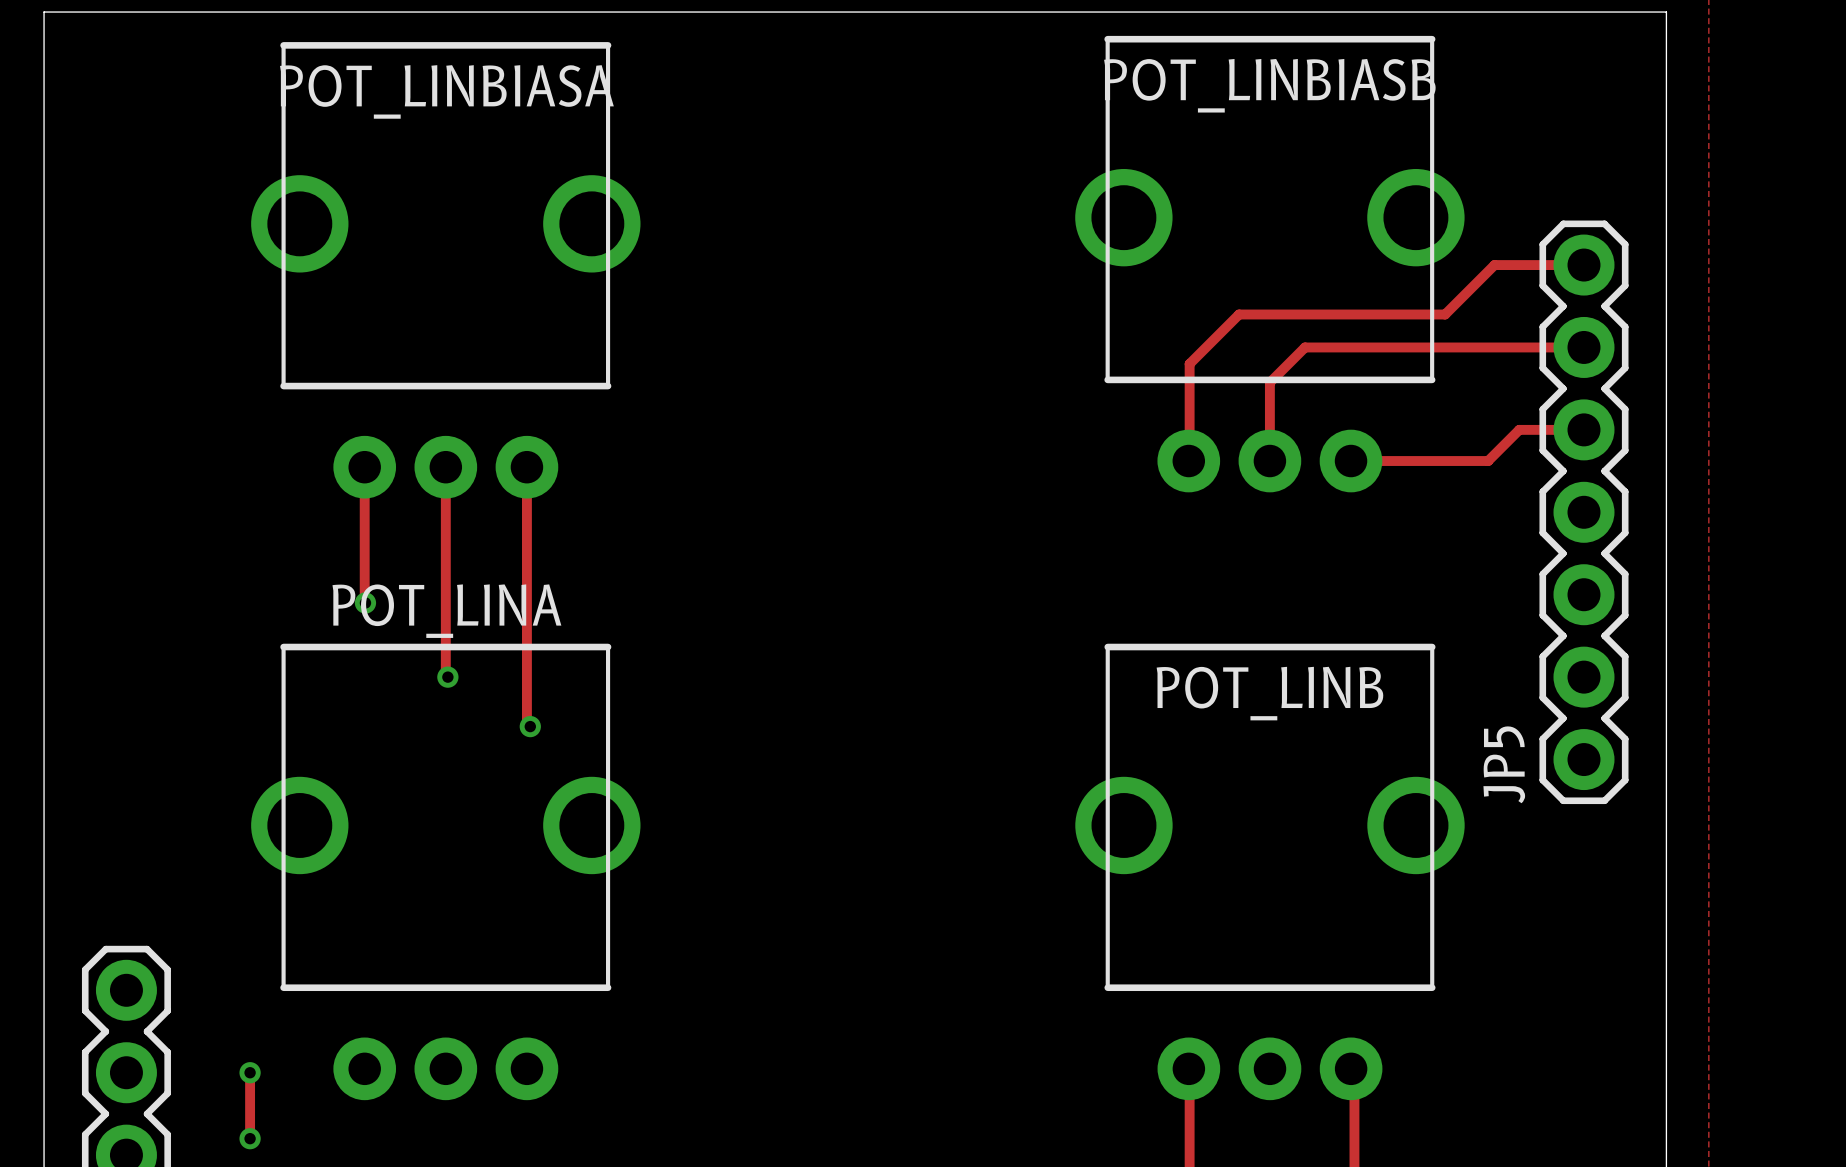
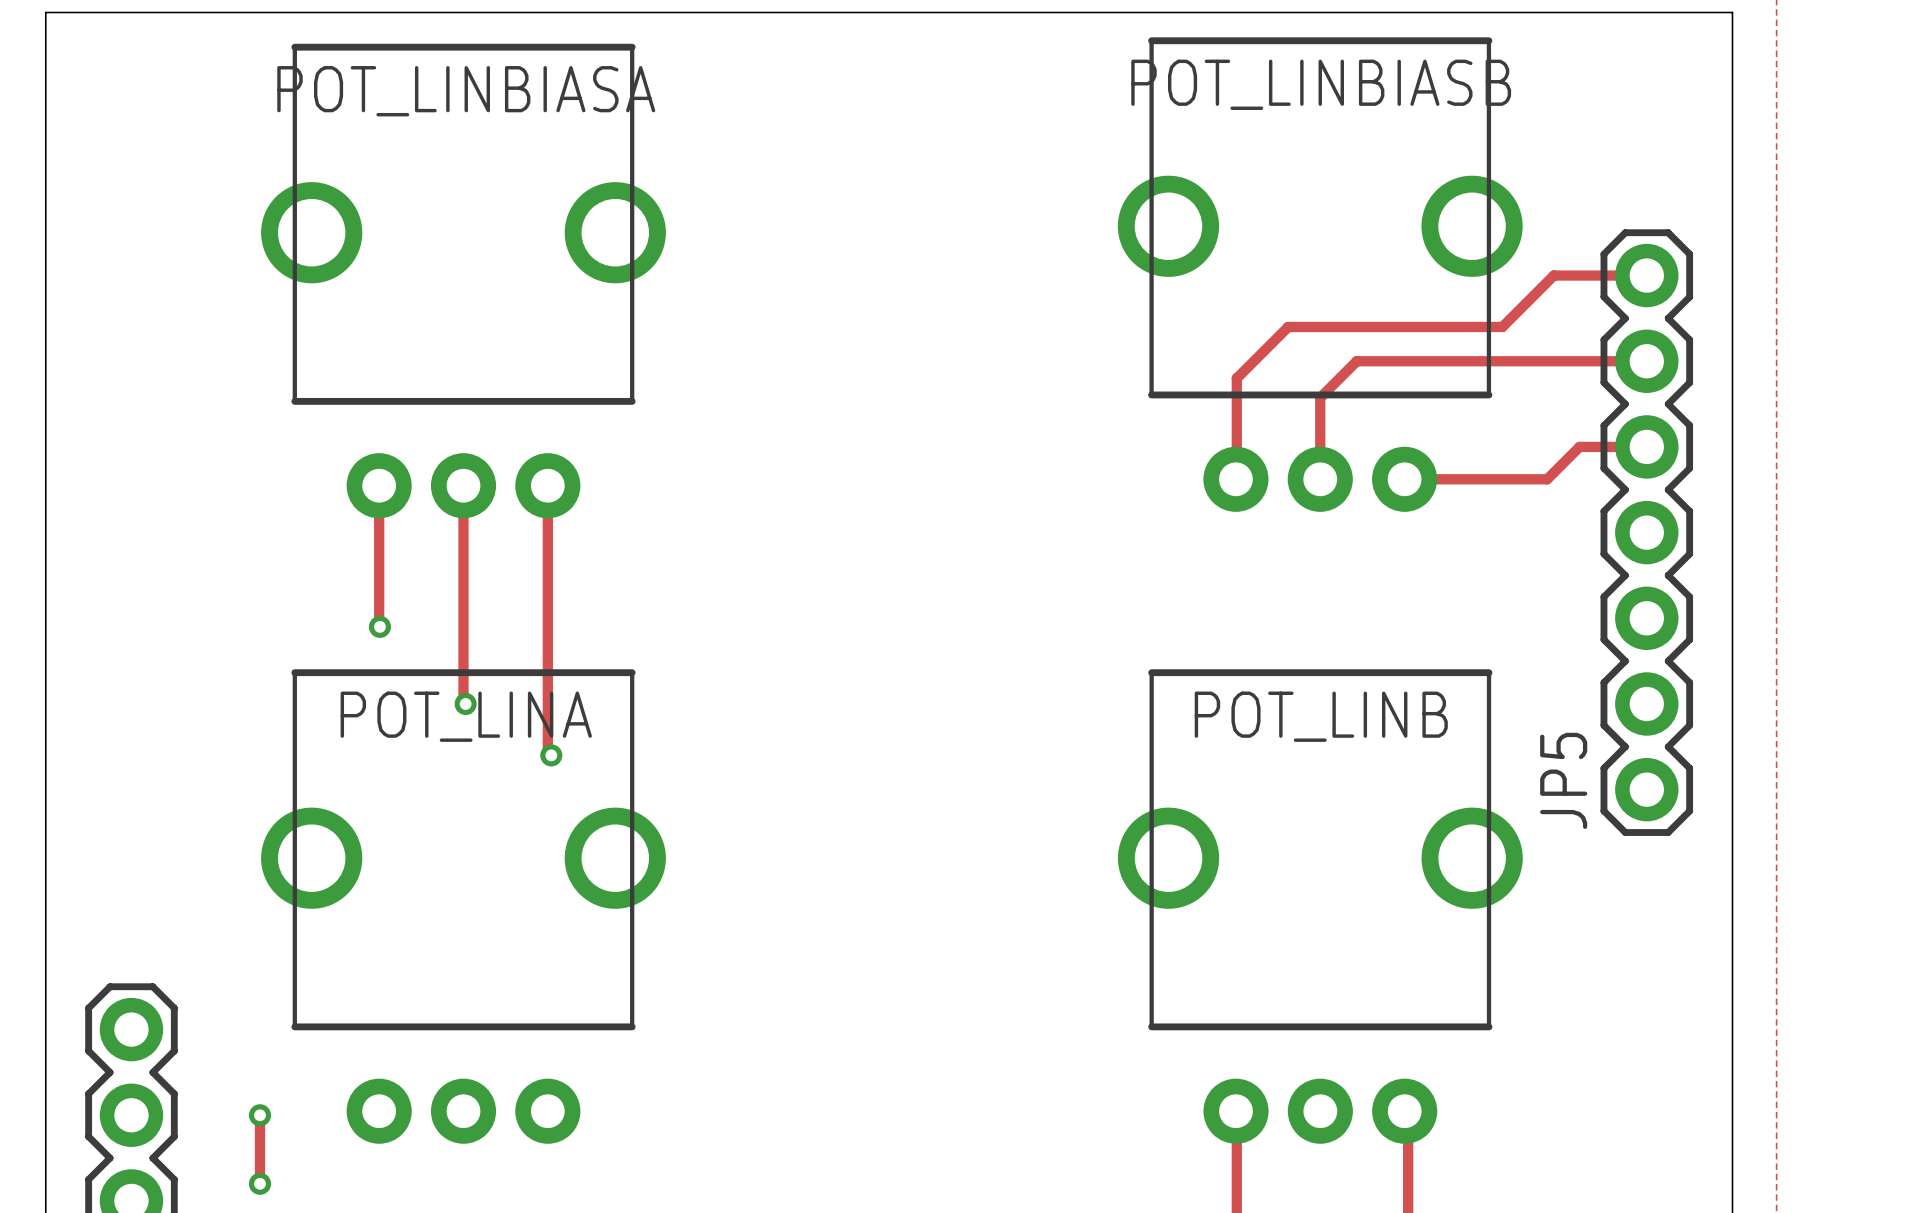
POT_LINA name position: POT_LINA (446, 611) -> POT_LINA (466, 716)

